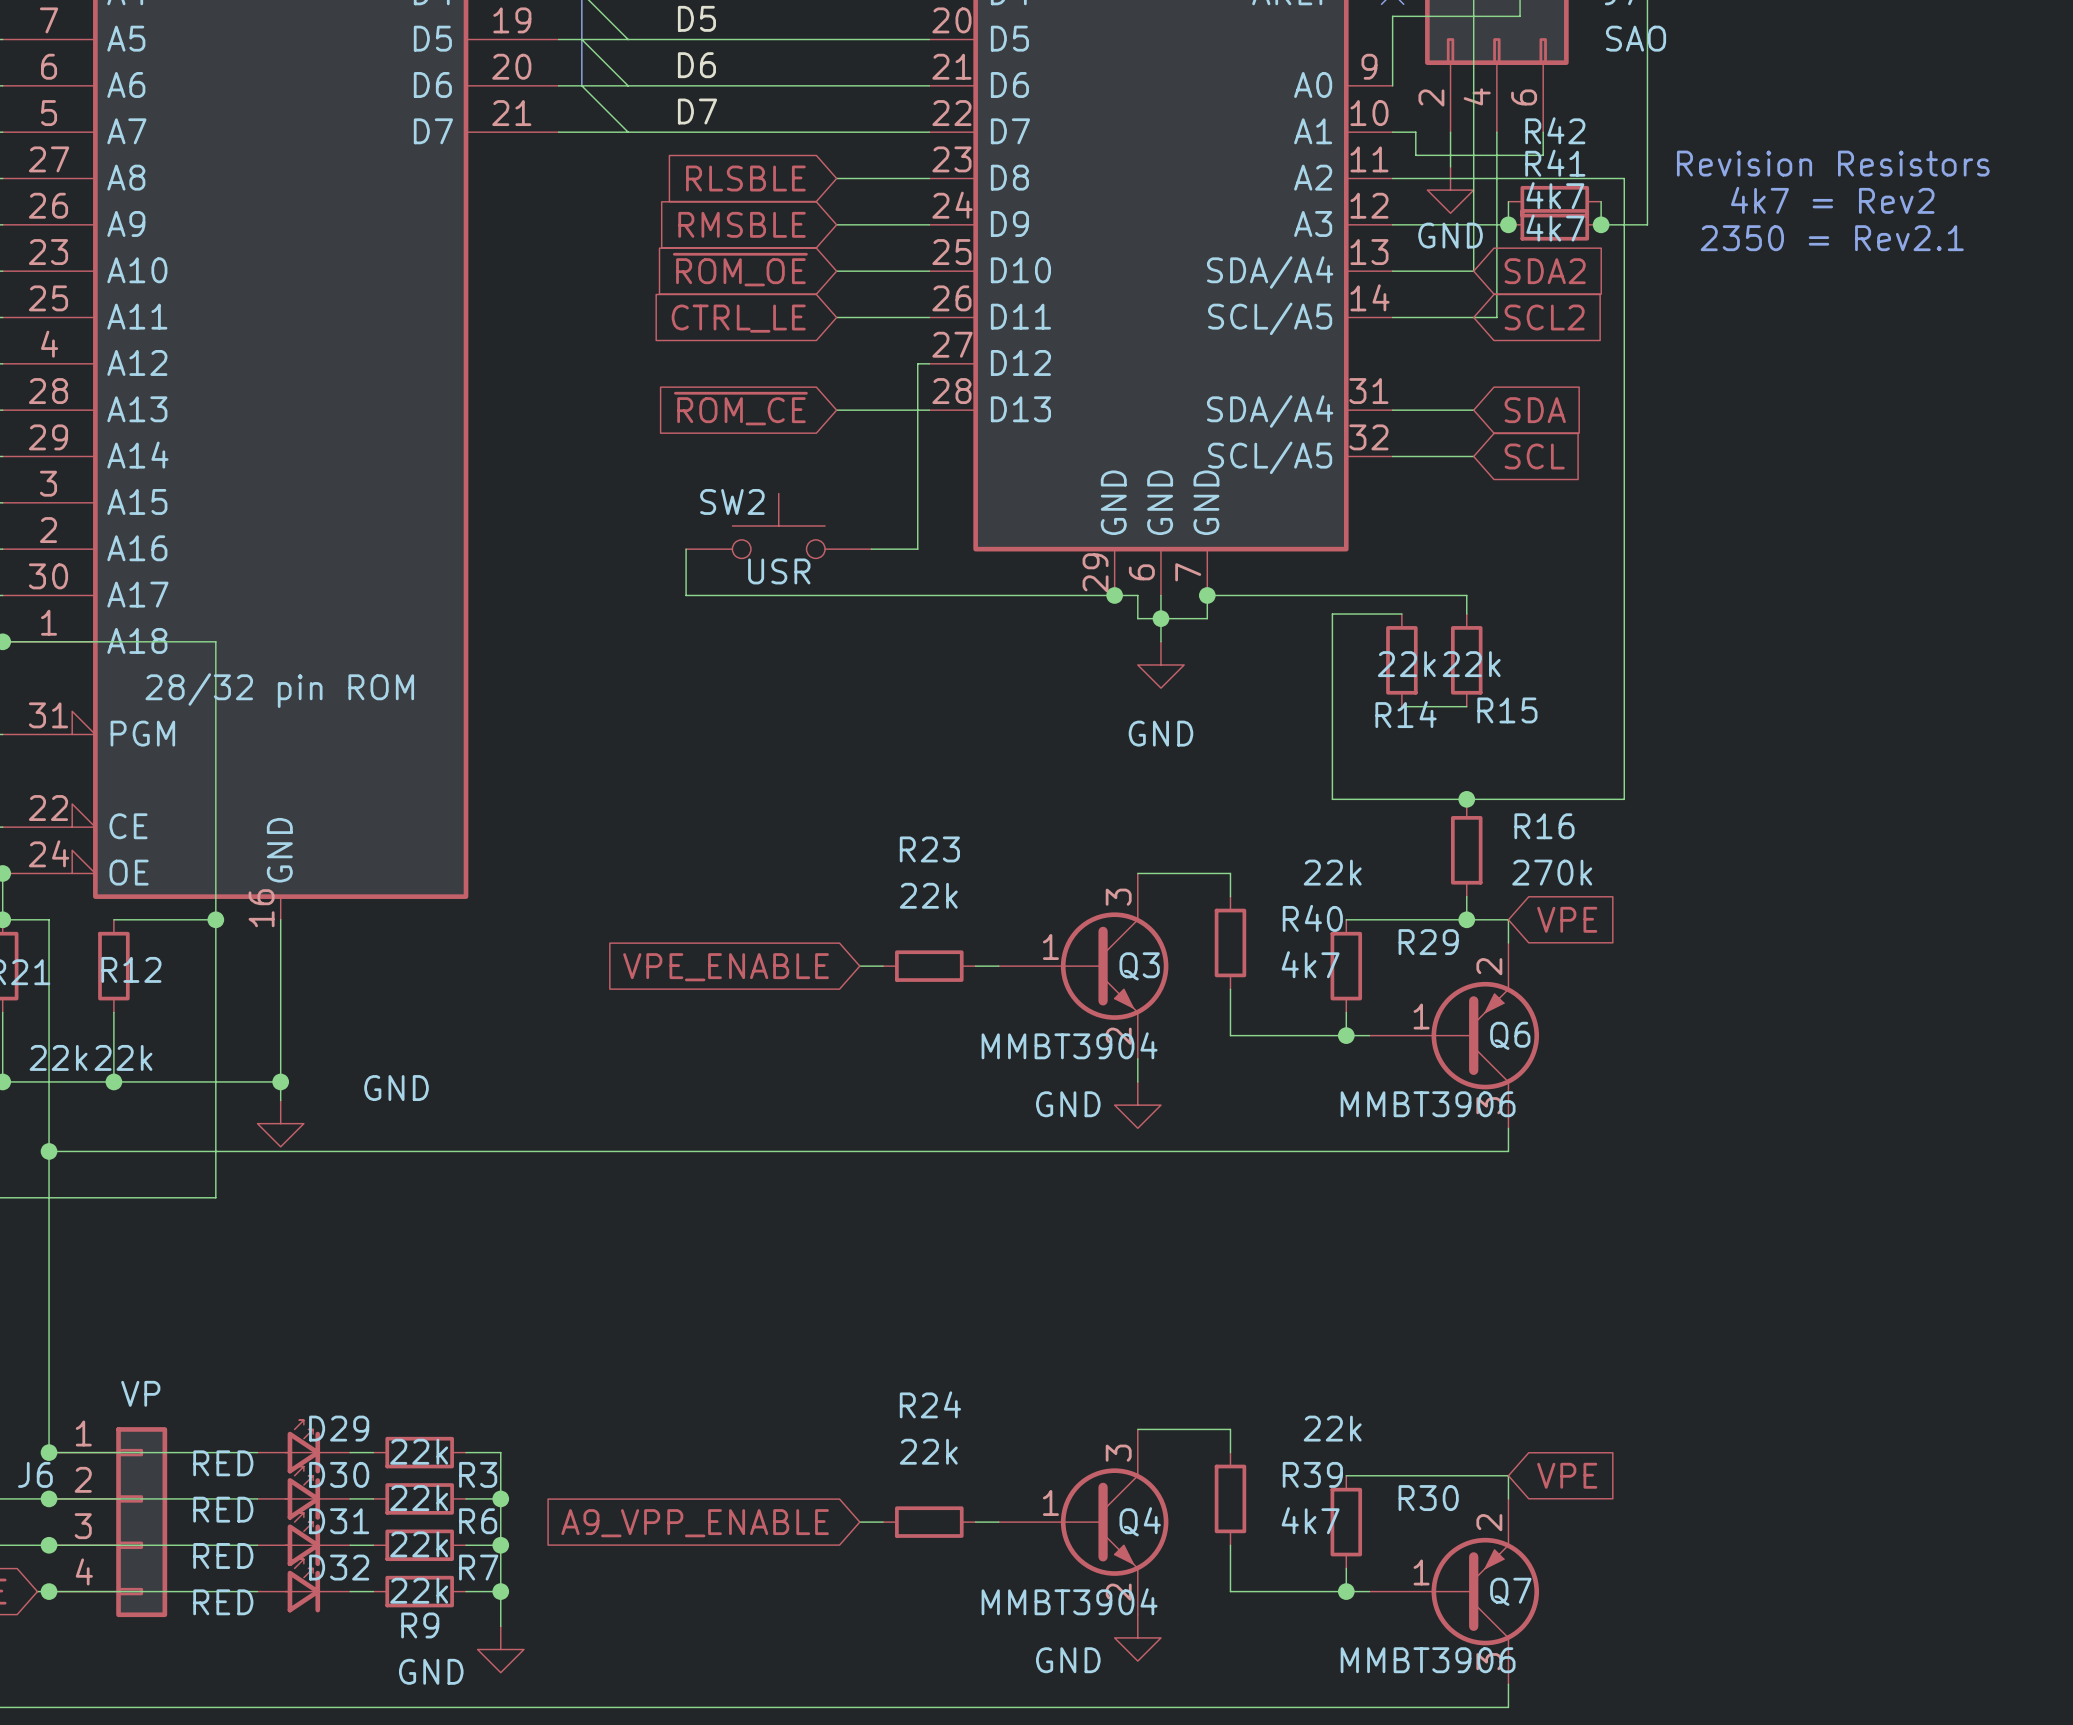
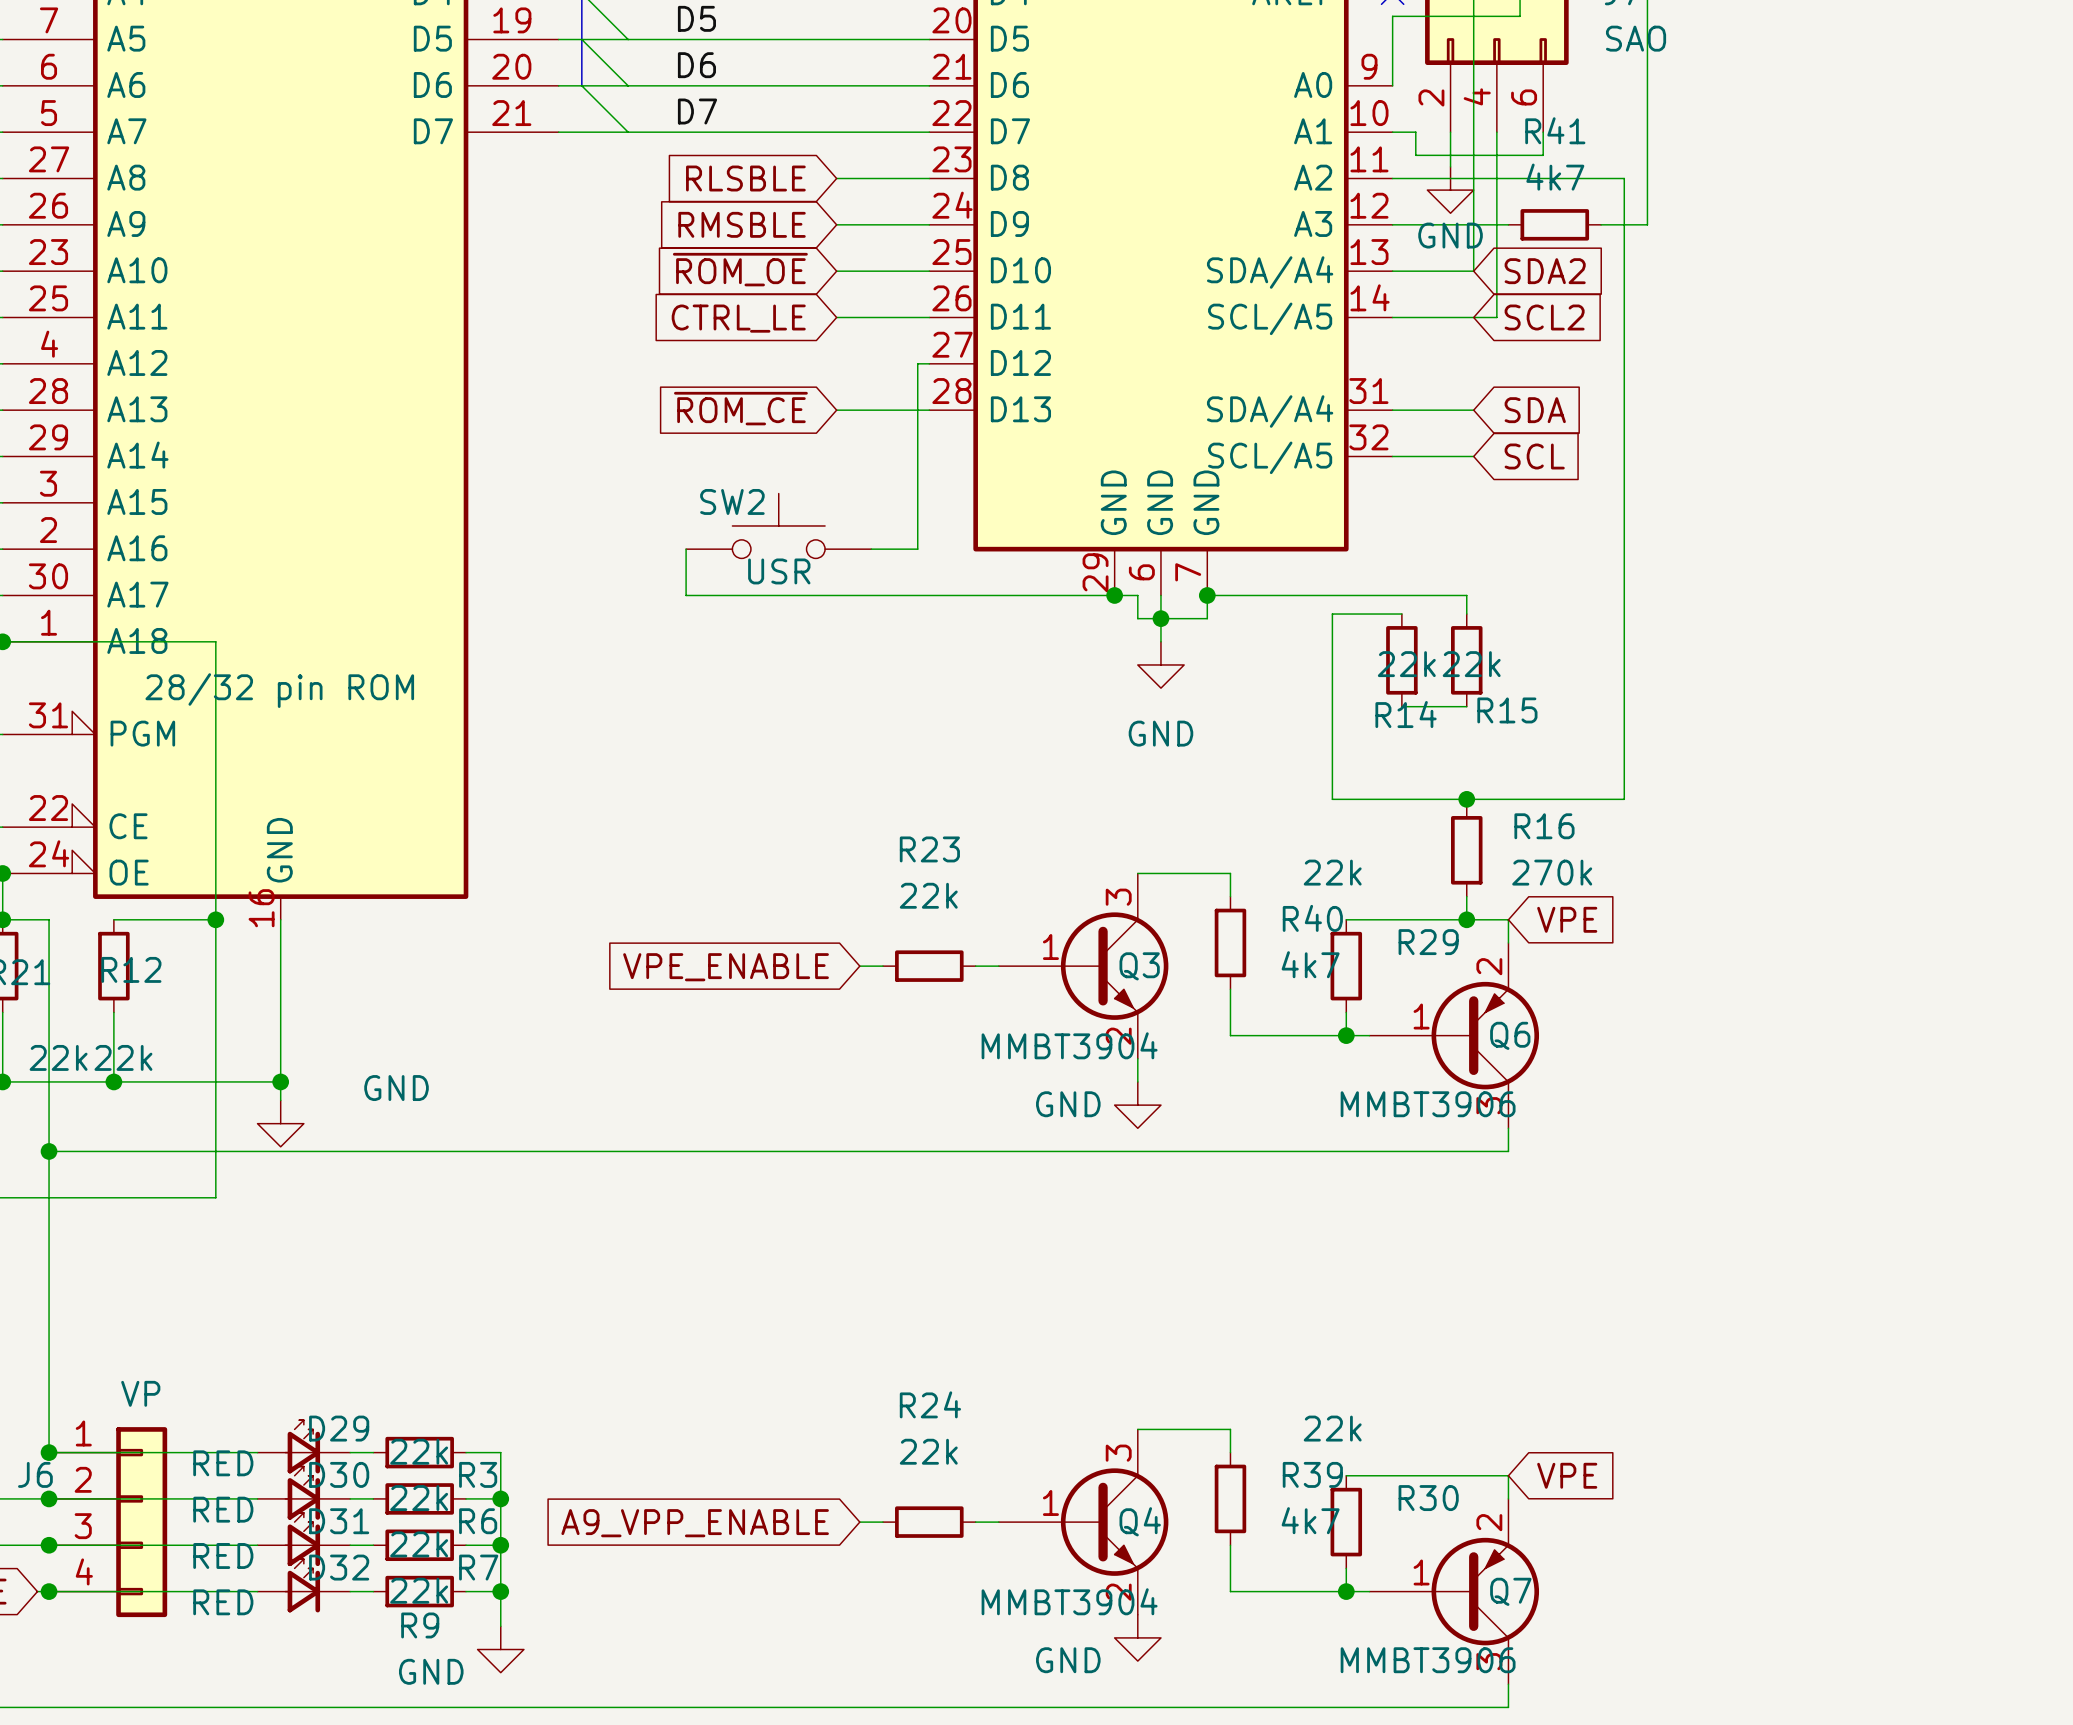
R41 name position: R41 (1555, 163) -> R41 (1555, 130)
text: Revision Resistors (1833, 163) -> none
text: 4k7 = Rev2 (1832, 200) -> none
wire: (1508, 201) (1508, 224) -> none
R42: 4k7 (1554, 201) -> none
wire: (1601, 201) (1601, 224) -> none
junction: (1508, 224) -> none
junction: (1601, 224) -> none
R41 value position: 4k7 (1555, 228) -> 4k7 (1555, 177)
text: 2350 = Rev2.1 (1832, 238) -> none

